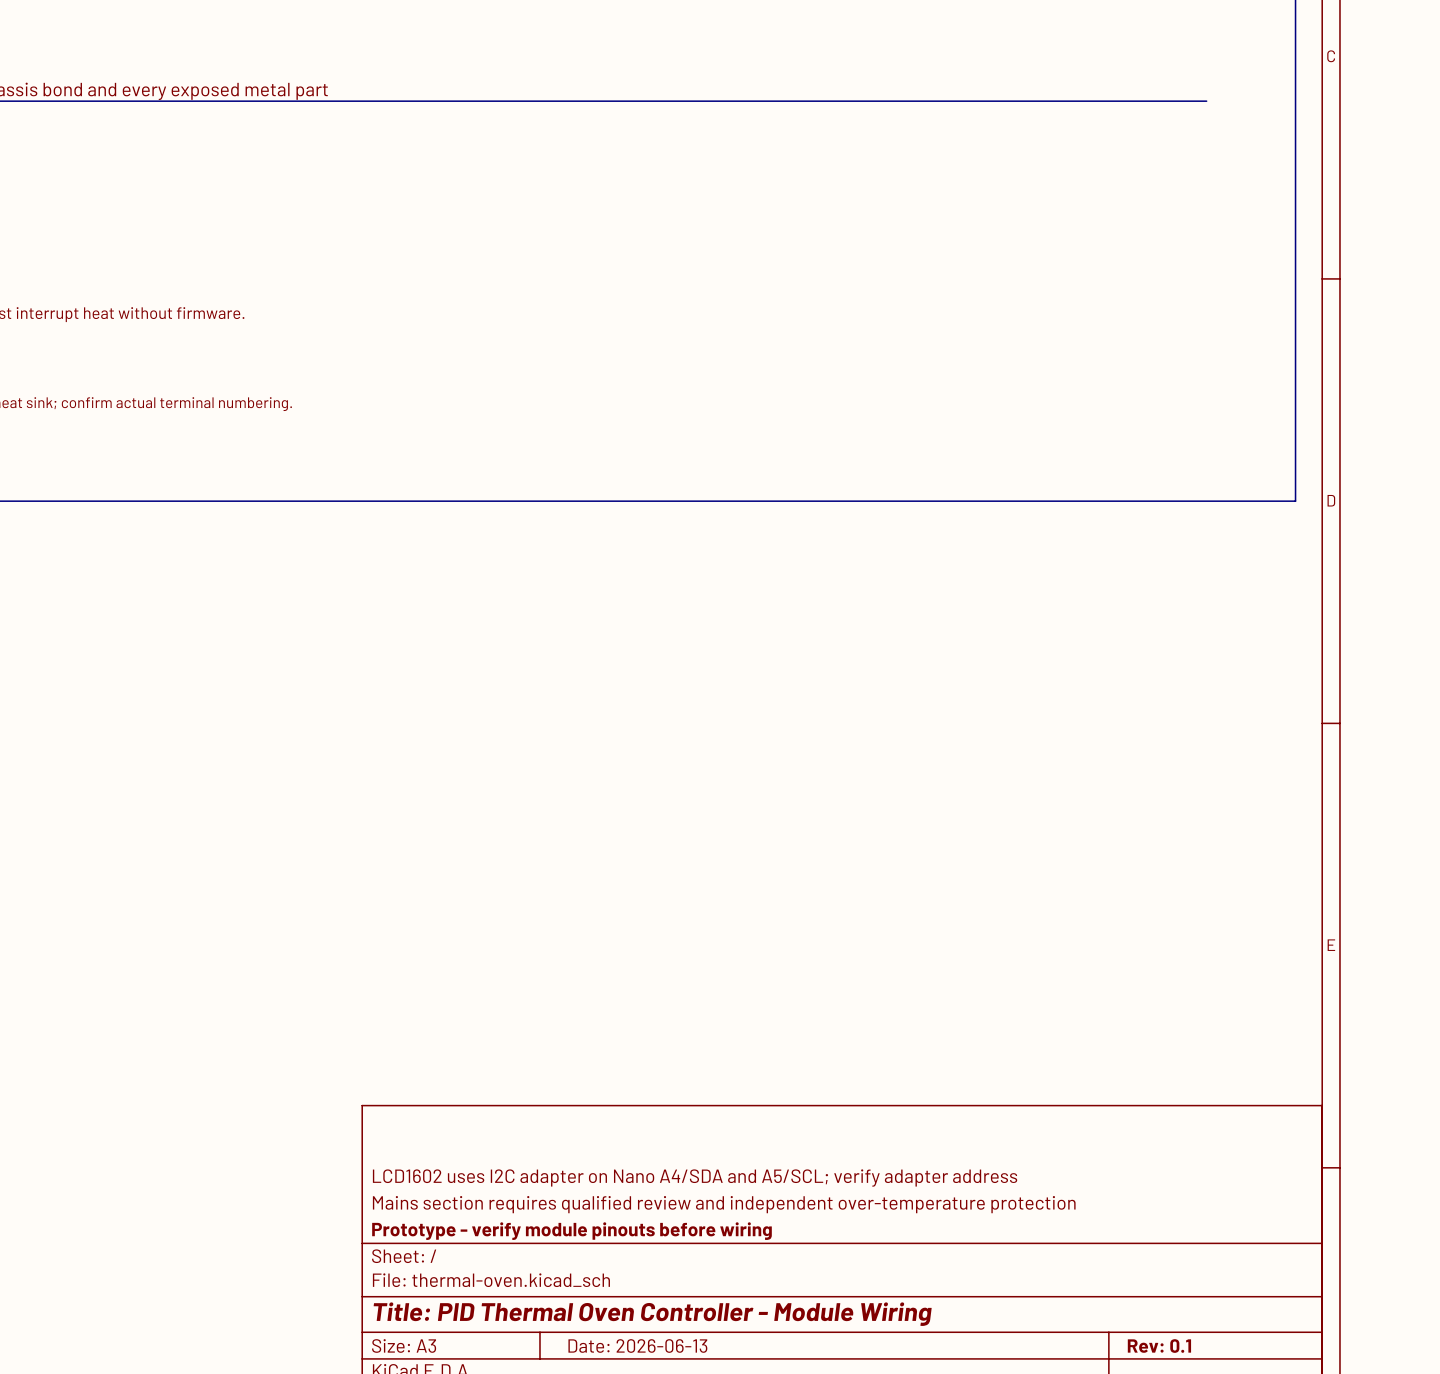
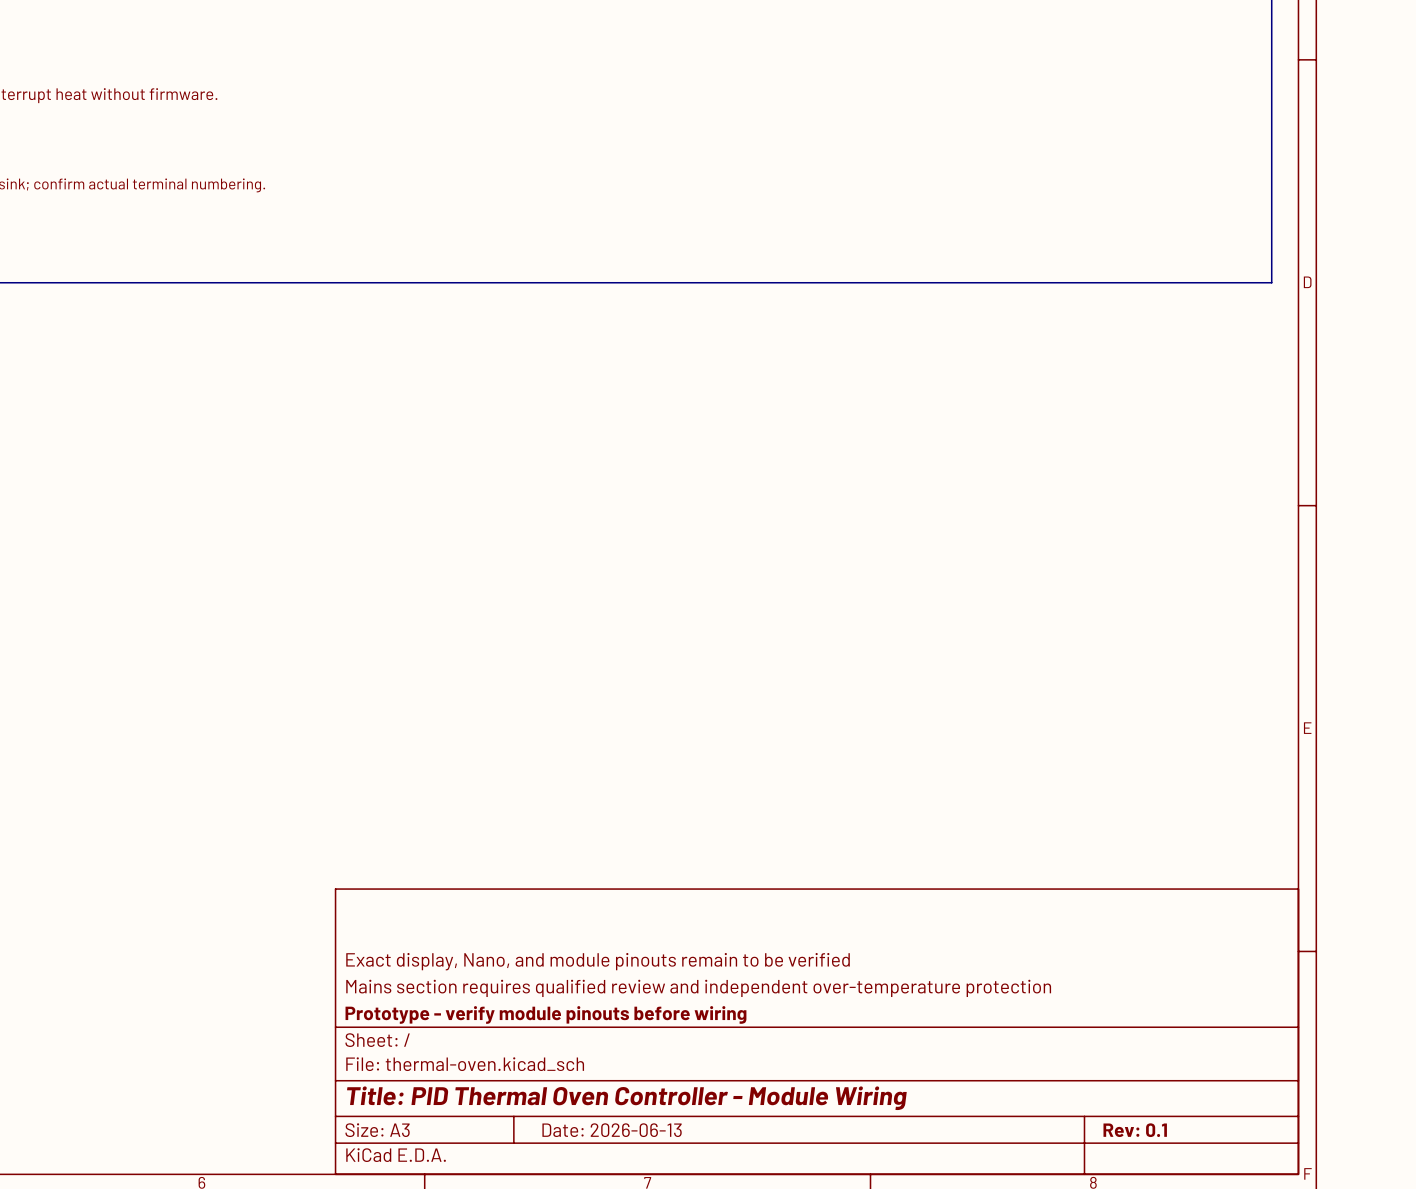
title block: LCD1602 uses I2C adapter on Nano A4/SDA and A5/SCL; verify adapter address (695, 1178) -> Exact display, Nano, and module pinouts remain to be verified (598, 961)

